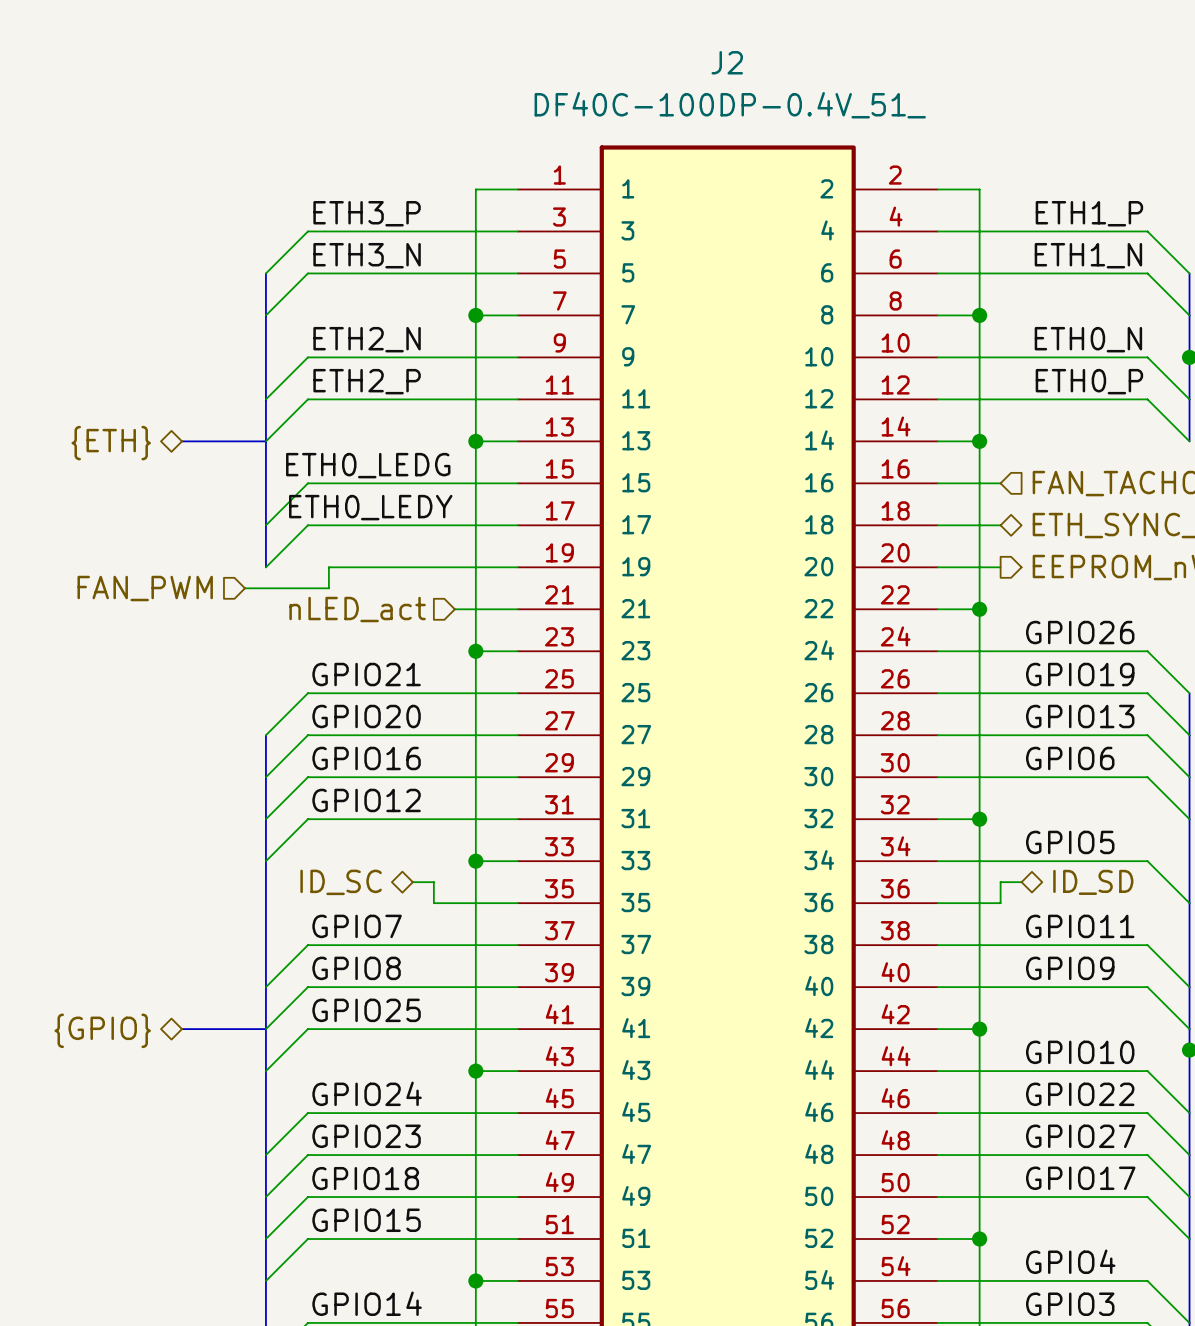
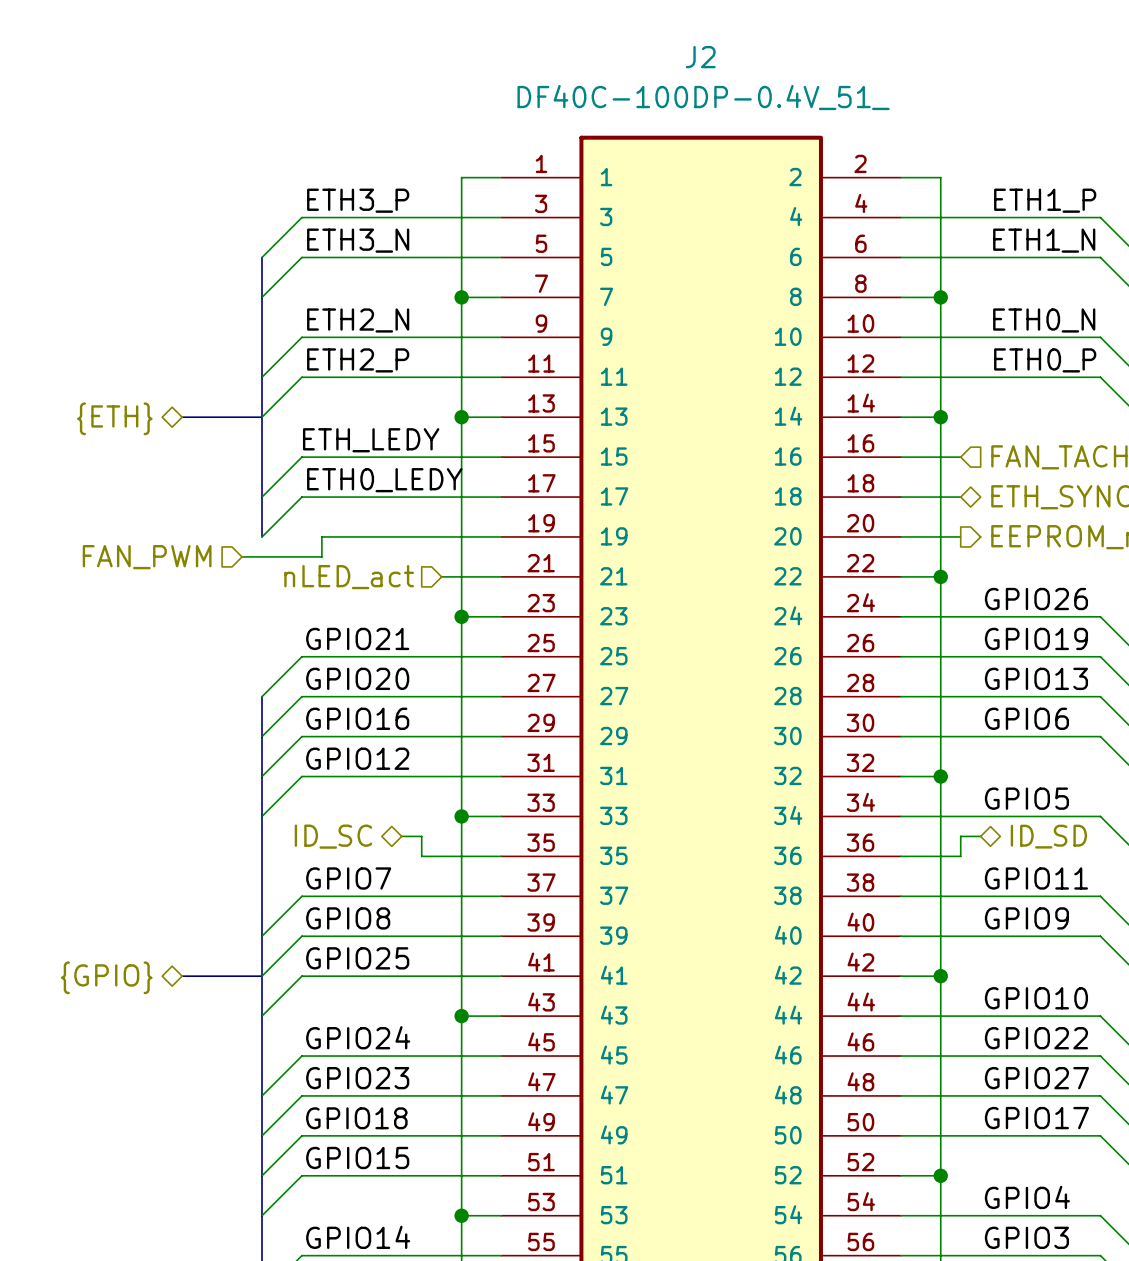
label: ETH0_LEDG (368, 465) -> ETH_LEDY (371, 440)
label position: ETH0_LEDY (370, 507) -> ETH0_LEDY (384, 480)

